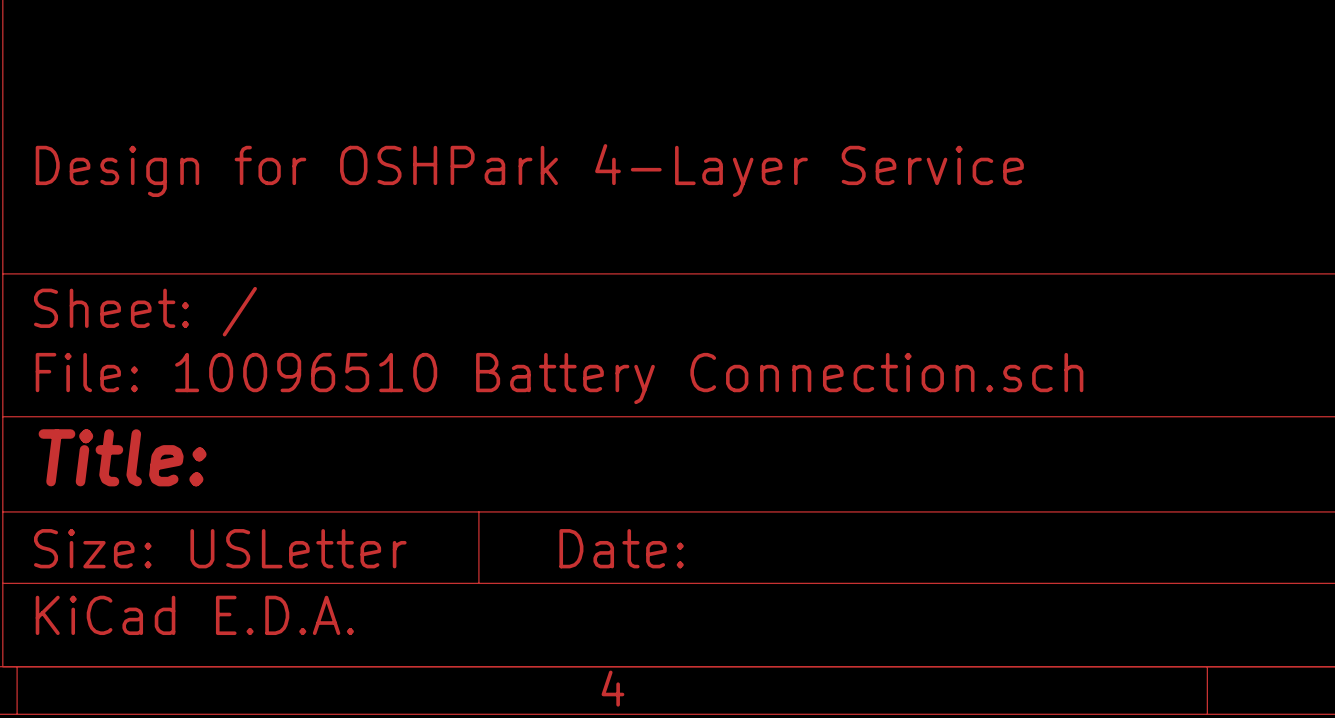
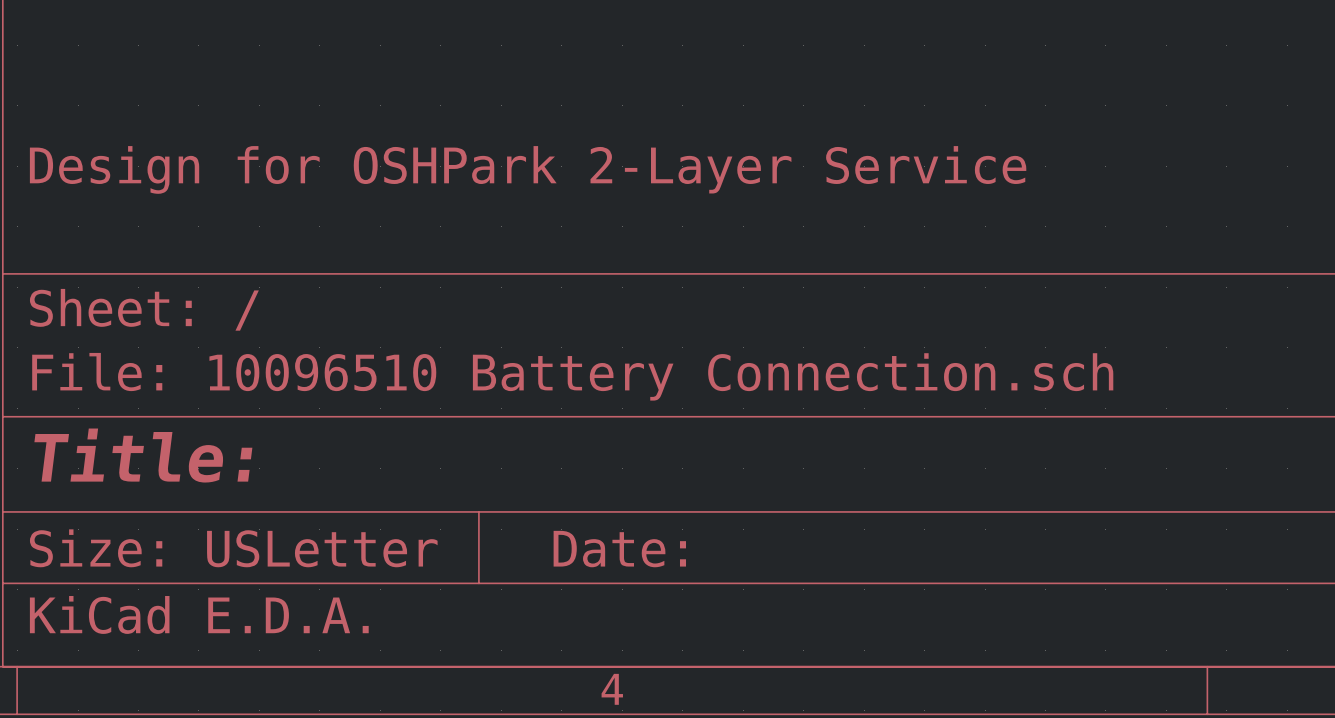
title block: Design for OSHPark 4-Layer Service (529, 170) -> Design for OSHPark 2-Layer Service (528, 169)

